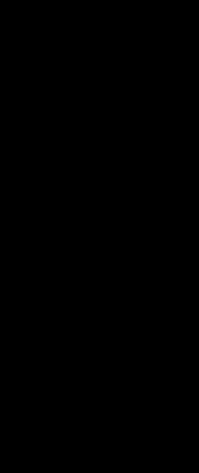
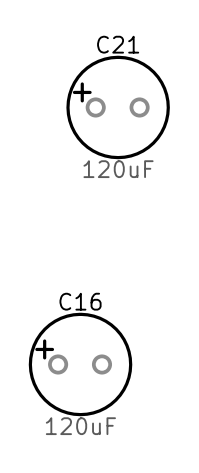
C21: none -> 120uF (118, 107)
C16: none -> 120uF (80, 364)

